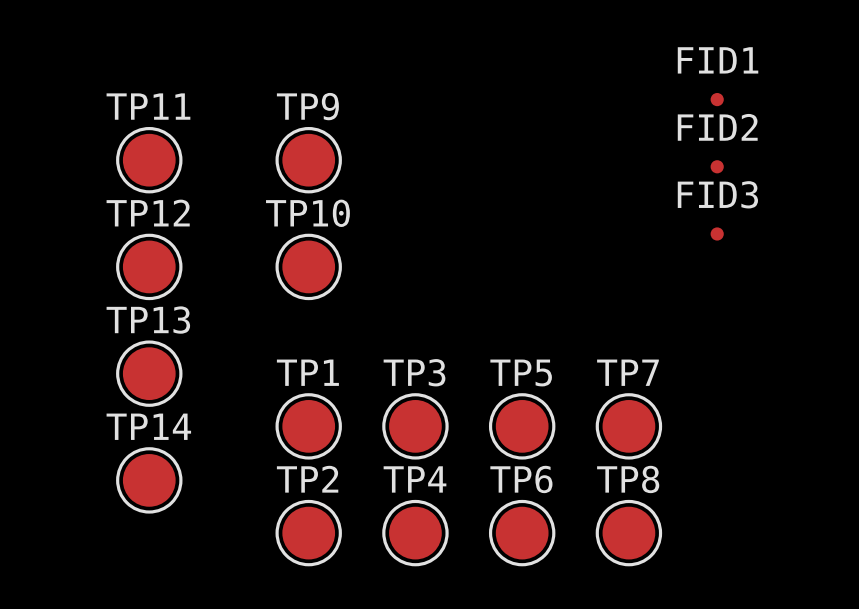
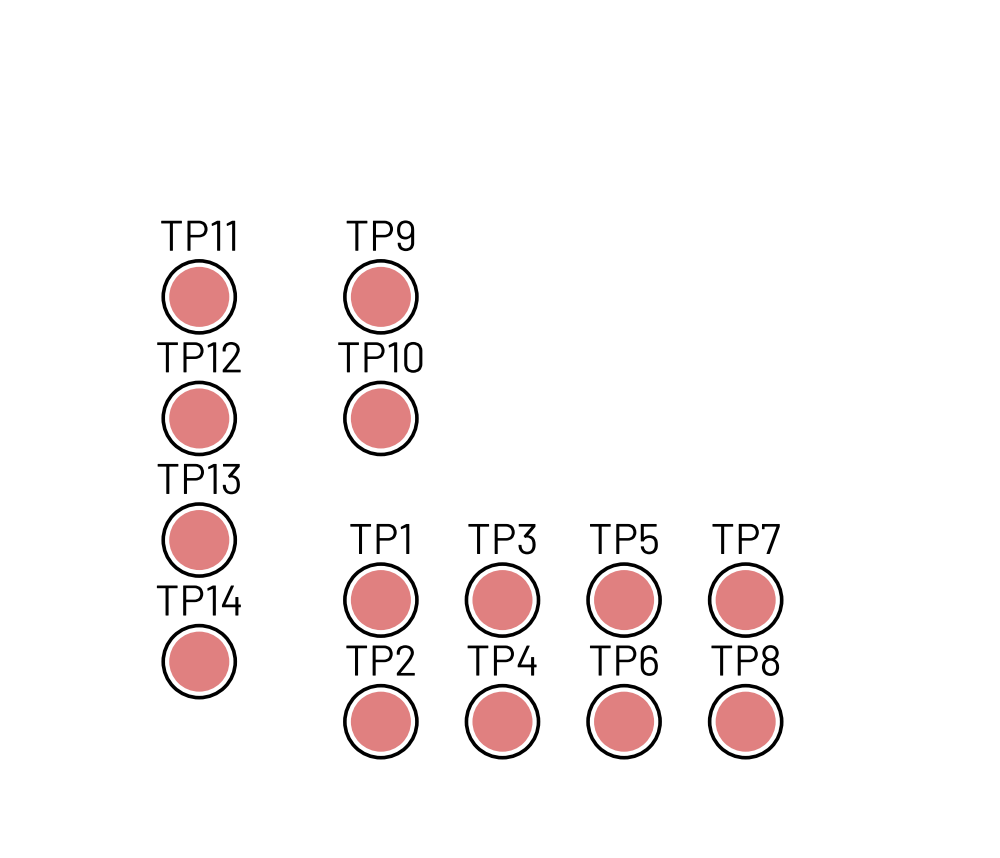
FID1: (717, 99) -> none
FID2: (717, 166) -> none
FID3: (717, 233) -> none

